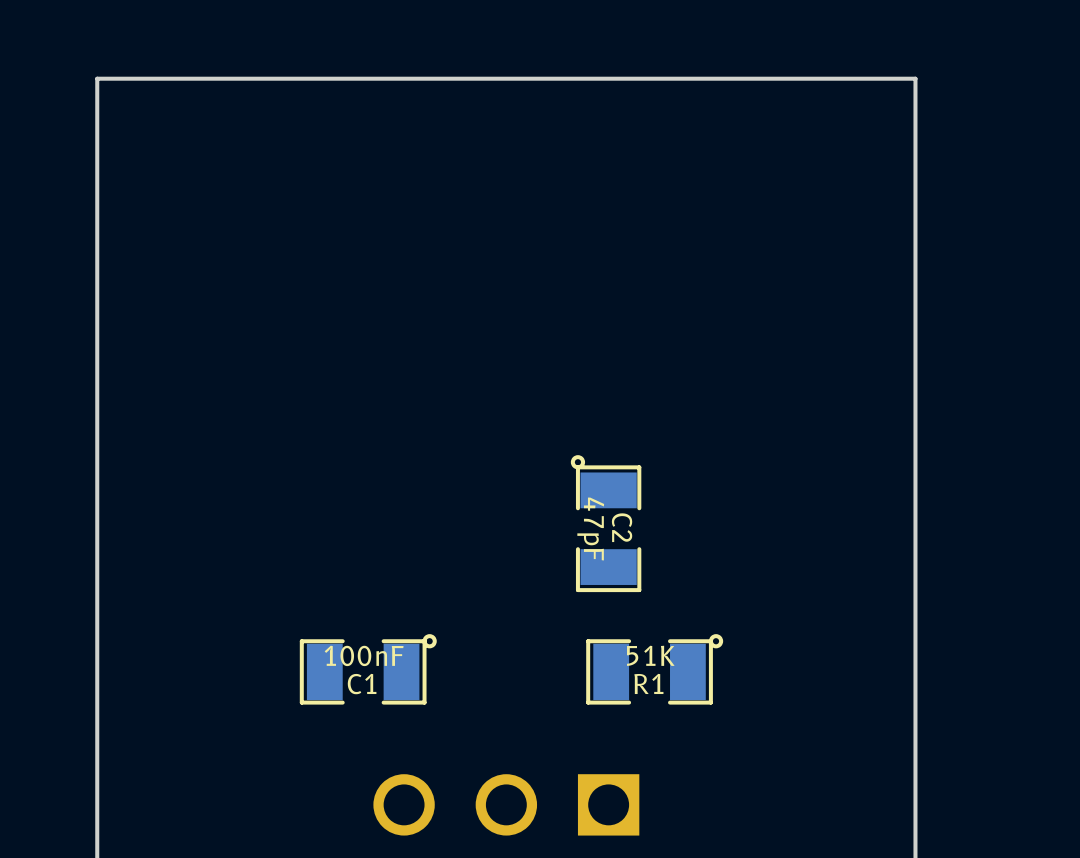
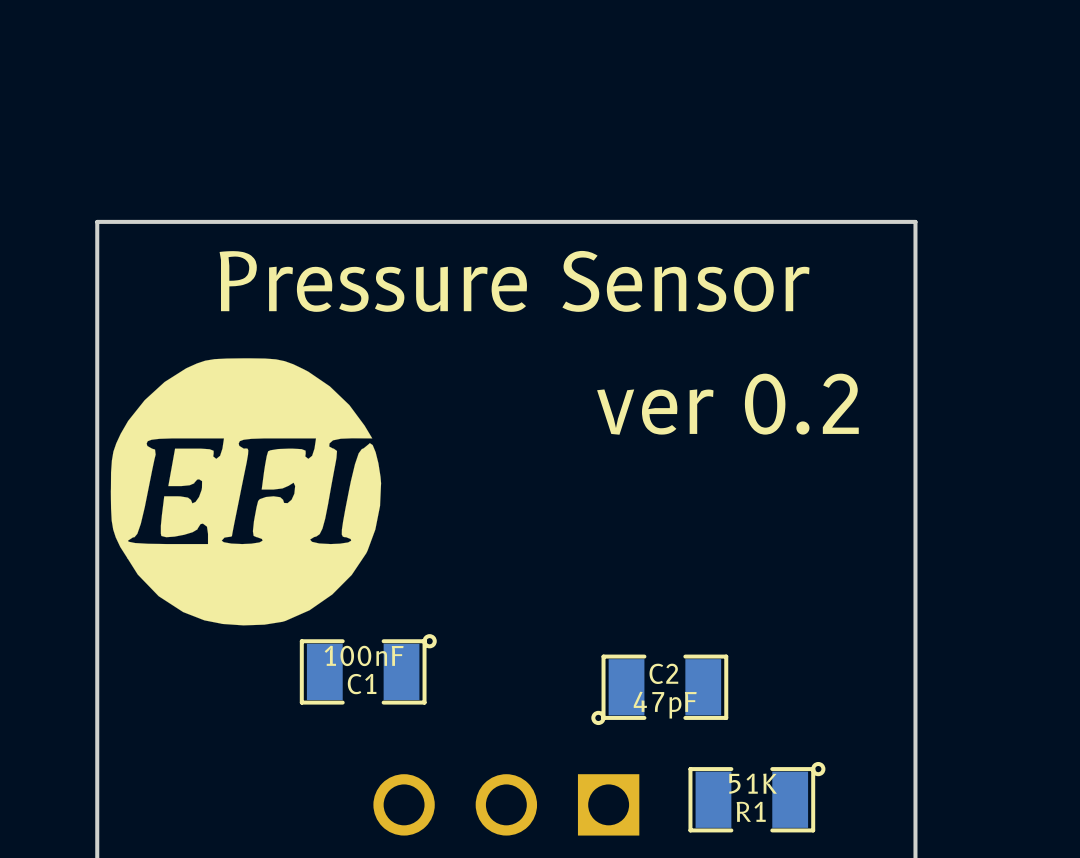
board edge: (915, 221) (915, 78) (97, 78) (97, 221) -> (915, 221) (97, 221)
text: none -> Pressure Sensor (514, 281)
drawing: none -> [110, 358, 382, 626]
text: none -> ver 0.2 (727, 404)
C2 rotation: 0° (606, 523) -> 90° counterclockwise (659, 689)
C2 position: (606, 523) -> (659, 689)
R1 position: (654, 669) -> (756, 797)

